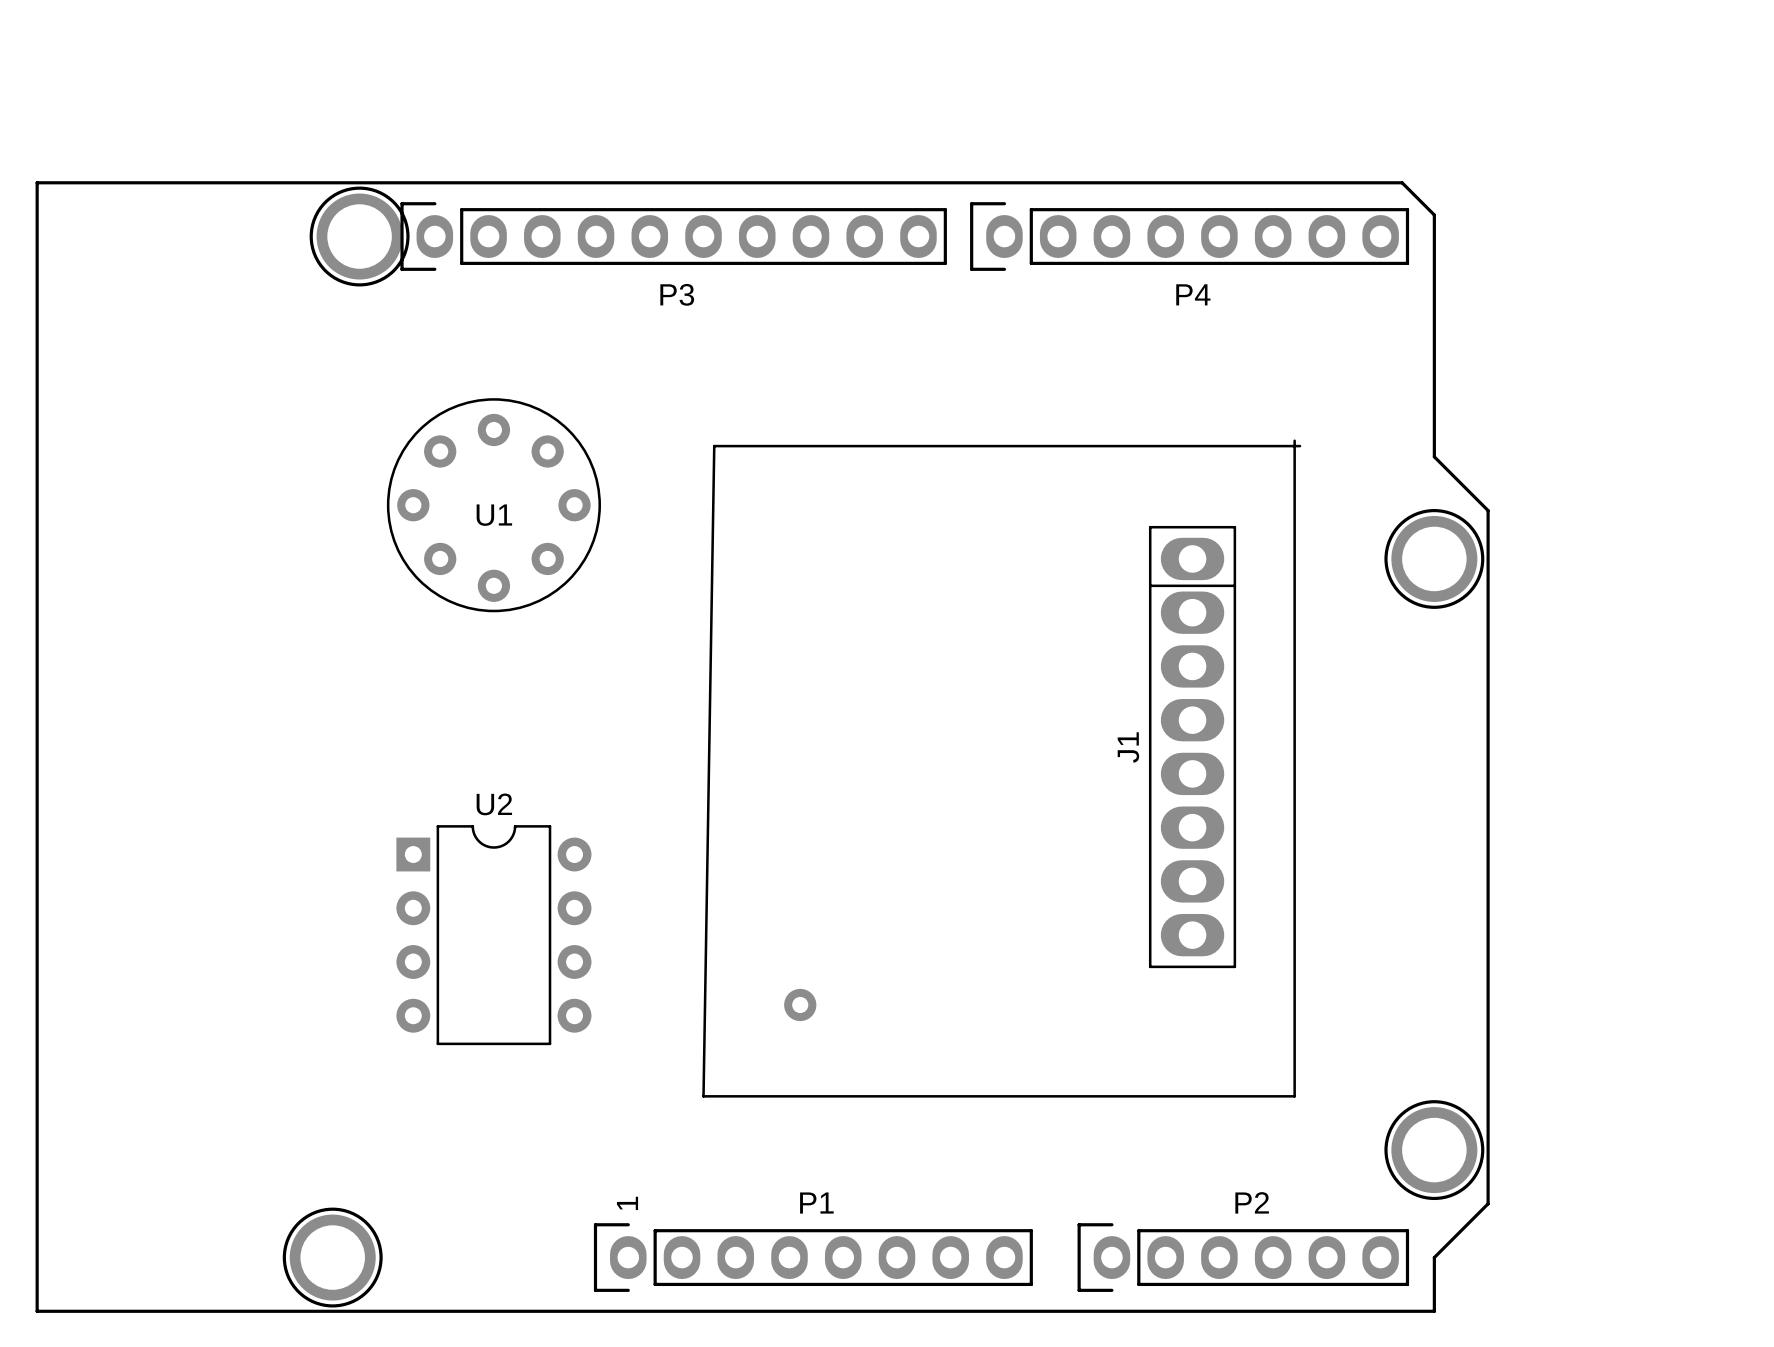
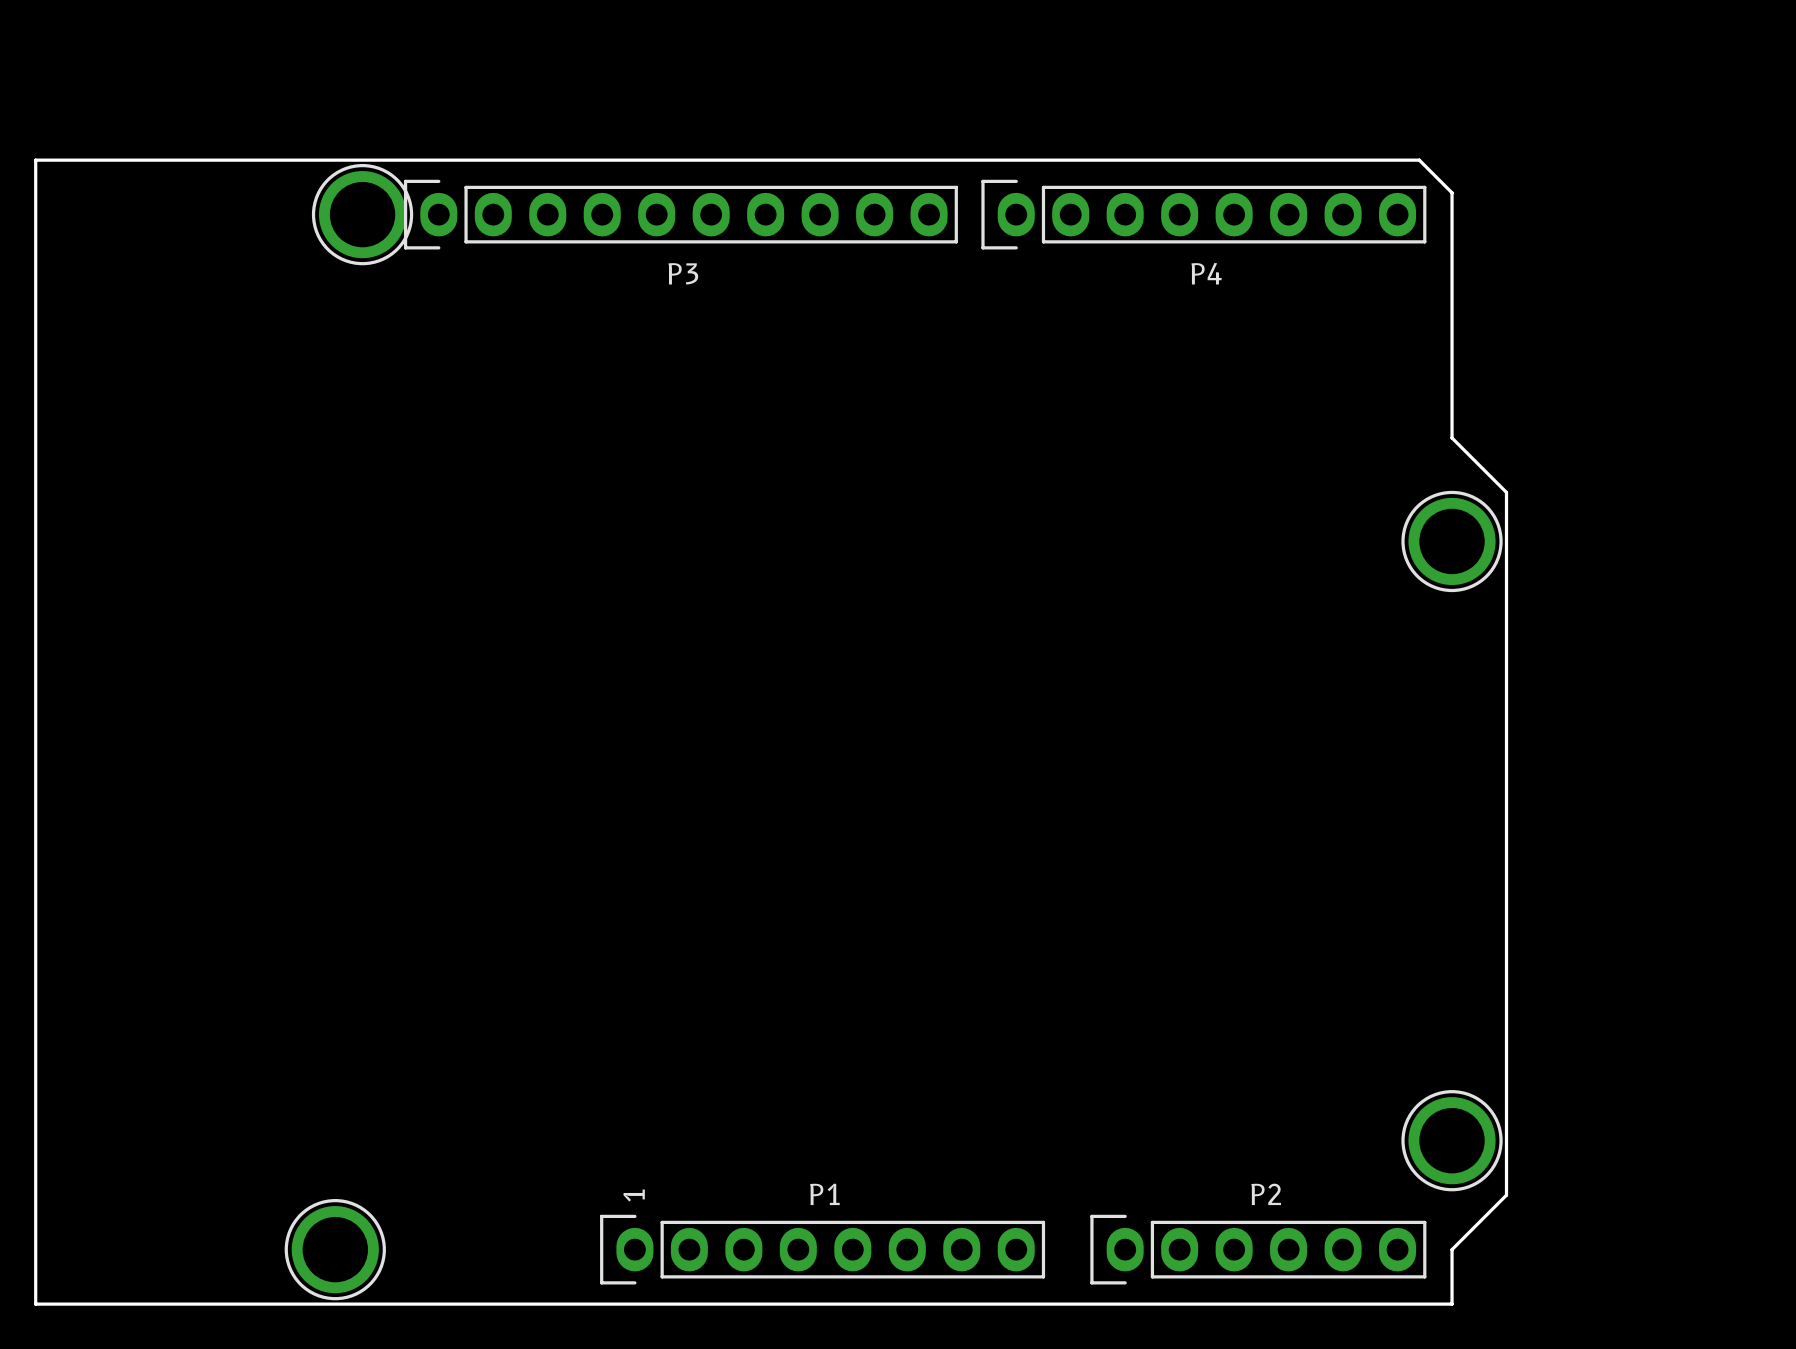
U1: (493, 505) -> none
J1: (1001, 768) -> none
U2: (493, 935) -> none

